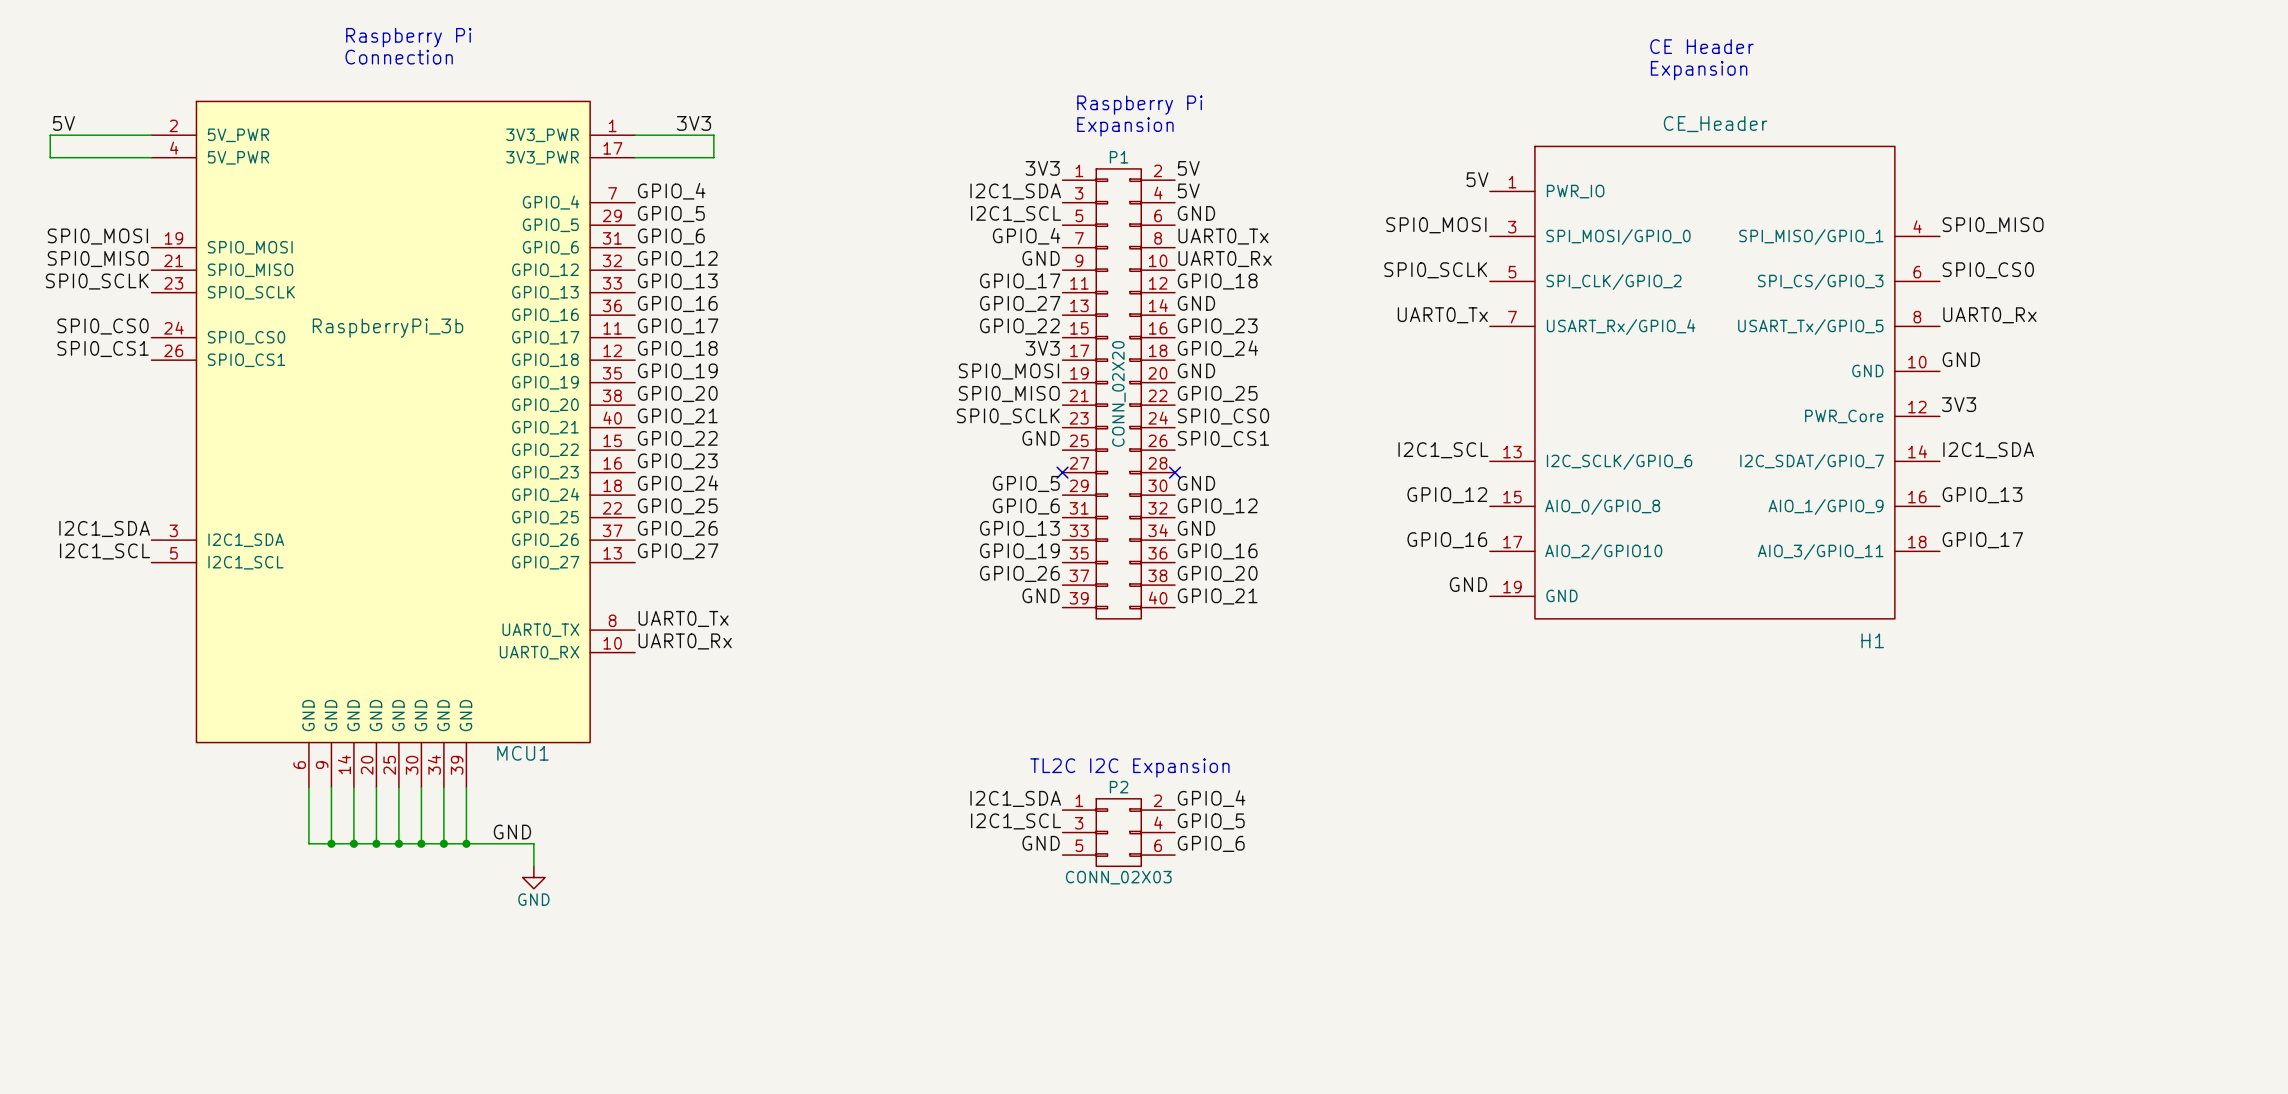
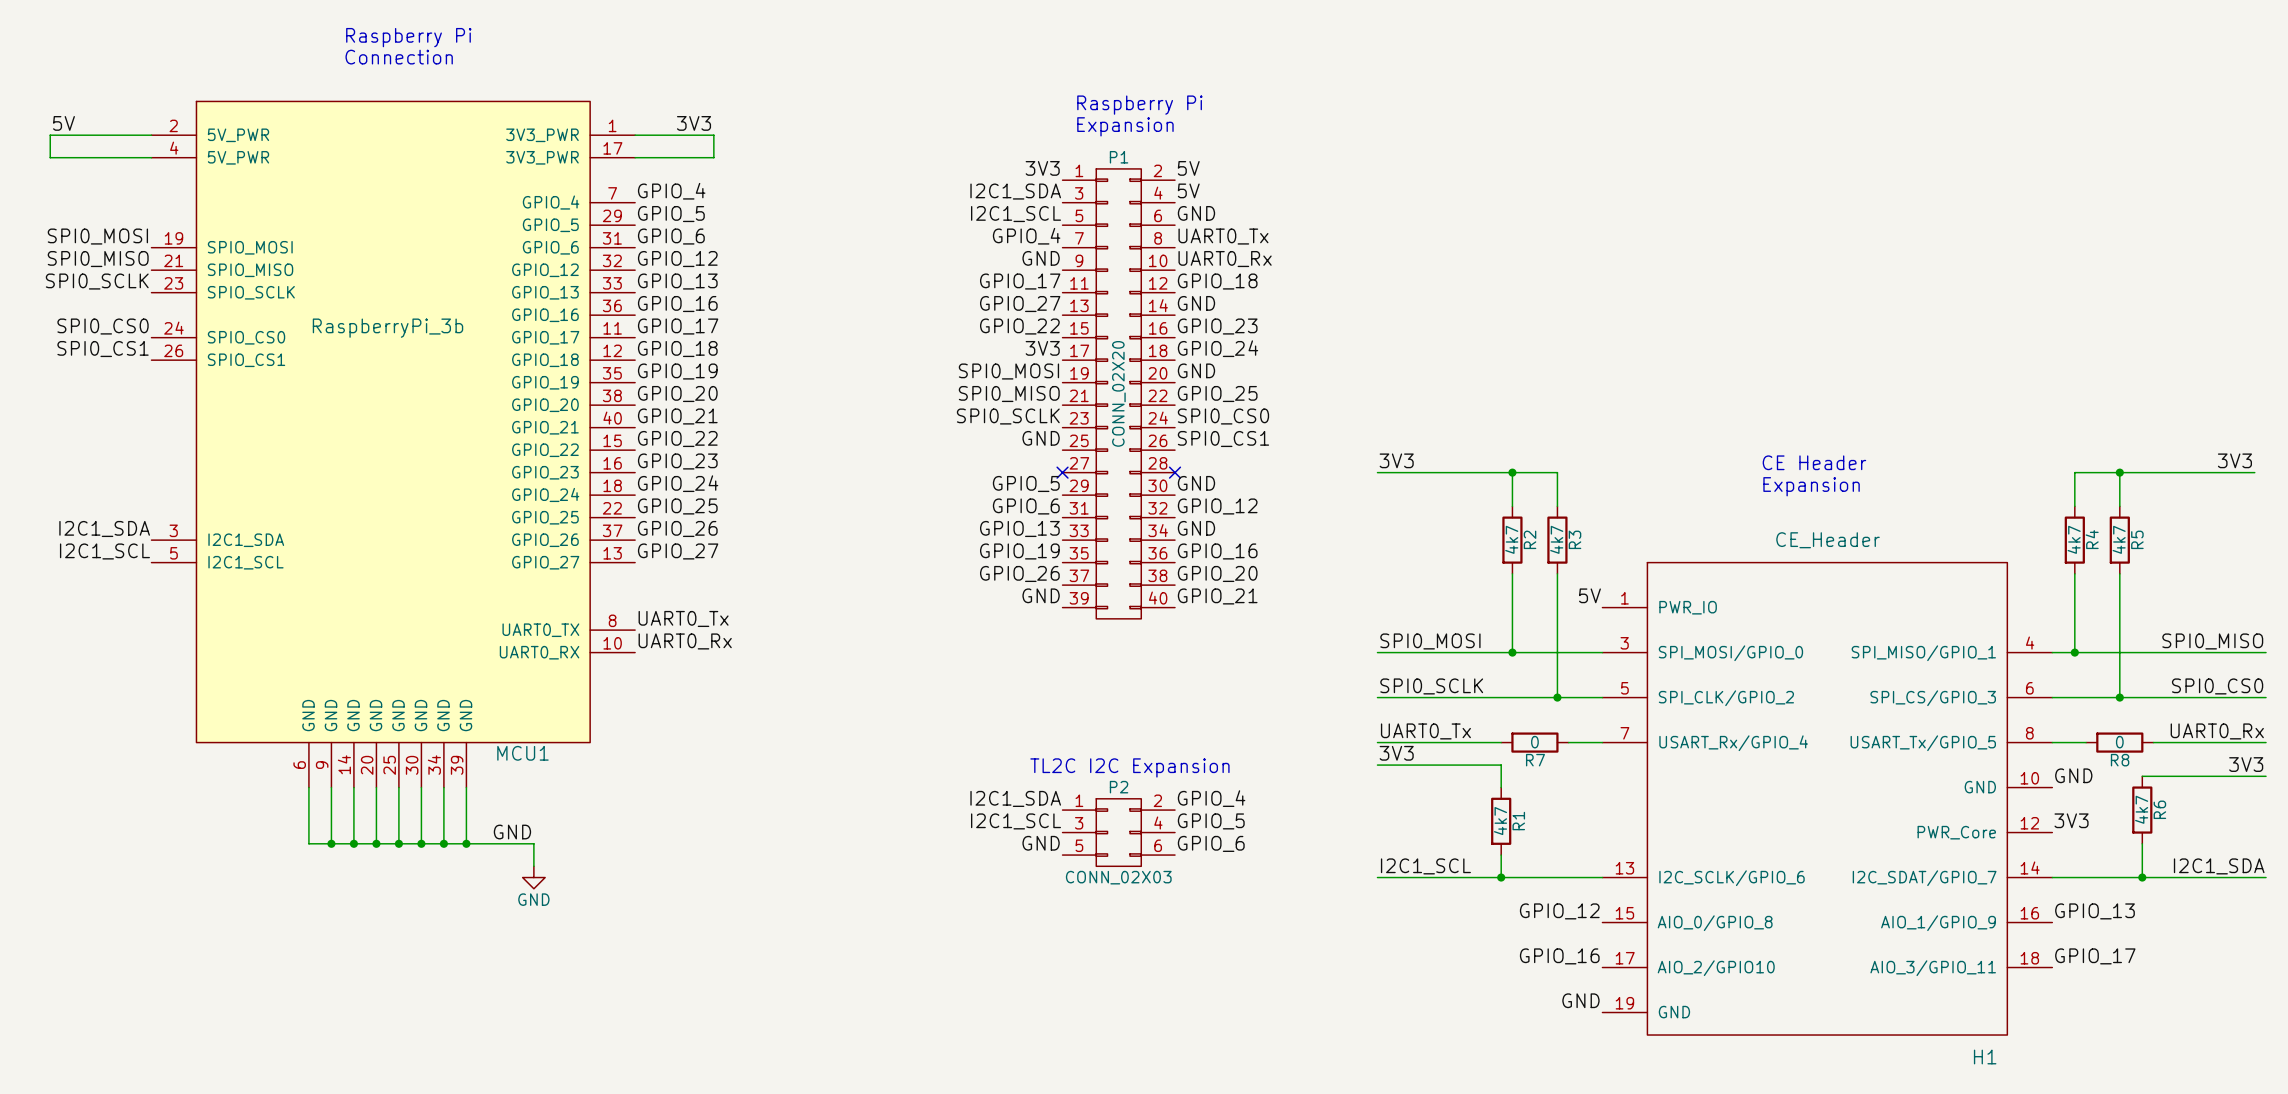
text: CE Header (1701, 46) -> none
text: Expansion (1699, 70) -> none
label: 5V (1477, 179) -> none
label: SPI0_MOSI (1436, 225) -> none
label: SPI0_MISO (1993, 225) -> none
label: SPI0_SCLK (1435, 270) -> none
label: SPI0_CS0 (1988, 270) -> none
label: UART0_Tx (1442, 315) -> none
label: UART0_Rx (1989, 315) -> none
label: GND (1961, 359) -> none
H1 position: (1714, 382) -> (1827, 798)
label: 3V3 (1959, 404) -> none
label: I2C1_SCL (1443, 450) -> none
label: I2C1_SDA (1988, 450) -> none
label: none -> 3V3 (1396, 460)
label: none -> 3V3 (2234, 460)
text: none -> CE Header (1814, 462)
wire: none -> (1377, 472) (1557, 472) (1557, 506)
wire: none -> (1512, 472) (1512, 506)
junction: none -> (1512, 472)
wire: none -> (2119, 472) (2119, 506)
junction: none -> (2119, 472)
wire: none -> (2254, 472) (2074, 472) (2074, 506)
text: none -> Expansion (1811, 486)
label: GPIO_12 (1447, 495) -> none
label: GPIO_13 (1982, 495) -> none
label: GPIO_16 (1447, 540) -> none
R2: none -> 4k7 (1512, 540)
R3: none -> 4k7 (1557, 540)
label: GPIO_17 (1982, 540) -> none
R4: none -> 4k7 (2074, 540)
R5: none -> 4k7 (2119, 540)
wire: none -> (1512, 573) (1512, 652)
wire: none -> (1557, 573) (1557, 697)
wire: none -> (2074, 573) (2074, 652)
wire: none -> (2119, 573) (2119, 697)
label: GND (1468, 584) -> none
label: none -> 5V (1589, 595)
label: none -> SPI0_MOSI (1430, 641)
label: none -> SPI0_MISO (2212, 641)
wire: none -> (1377, 652) (1602, 652)
junction: none -> (1512, 652)
wire: none -> (2052, 652) (2266, 652)
junction: none -> (2074, 652)
label: none -> SPI0_SCLK (1431, 686)
label: none -> SPI0_CS0 (2217, 686)
wire: none -> (1377, 697) (1602, 697)
junction: none -> (1557, 697)
wire: none -> (2052, 697) (2266, 697)
junction: none -> (2119, 697)
label: none -> UART0_Tx (1425, 731)
label: none -> UART0_Rx (2217, 731)
wire: none -> (1377, 742) (1501, 742)
R7: none -> 0 (1534, 742)
wire: none -> (1568, 742) (1602, 742)
wire: none -> (2052, 742) (2086, 742)
R8: none -> 0 (2119, 742)
wire: none -> (2153, 742) (2266, 742)
label: none -> 3V3 (1396, 753)
label: none -> 3V3 (2246, 764)
wire: none -> (1377, 765) (1501, 765) (1501, 787)
label: none -> GND (2073, 775)
wire: none -> (2142, 776) (2266, 776)
R6: none -> 4k7 (2142, 810)
label: none -> 3V3 (2071, 820)
R1: none -> 4k7 (1501, 821)
wire: none -> (2142, 843) (2142, 877)
wire: none -> (1501, 855) (1501, 877)
label: none -> I2C1_SCL (1425, 866)
label: none -> I2C1_SDA (2219, 866)
wire: none -> (1377, 877) (1602, 877)
junction: none -> (1501, 877)
wire: none -> (2052, 877) (2266, 877)
junction: none -> (2142, 877)
label: none -> GPIO_12 (1559, 911)
label: none -> GPIO_13 (2094, 911)
label: none -> GPIO_16 (1559, 956)
label: none -> GPIO_17 (2095, 956)
label: none -> GND (1580, 1000)

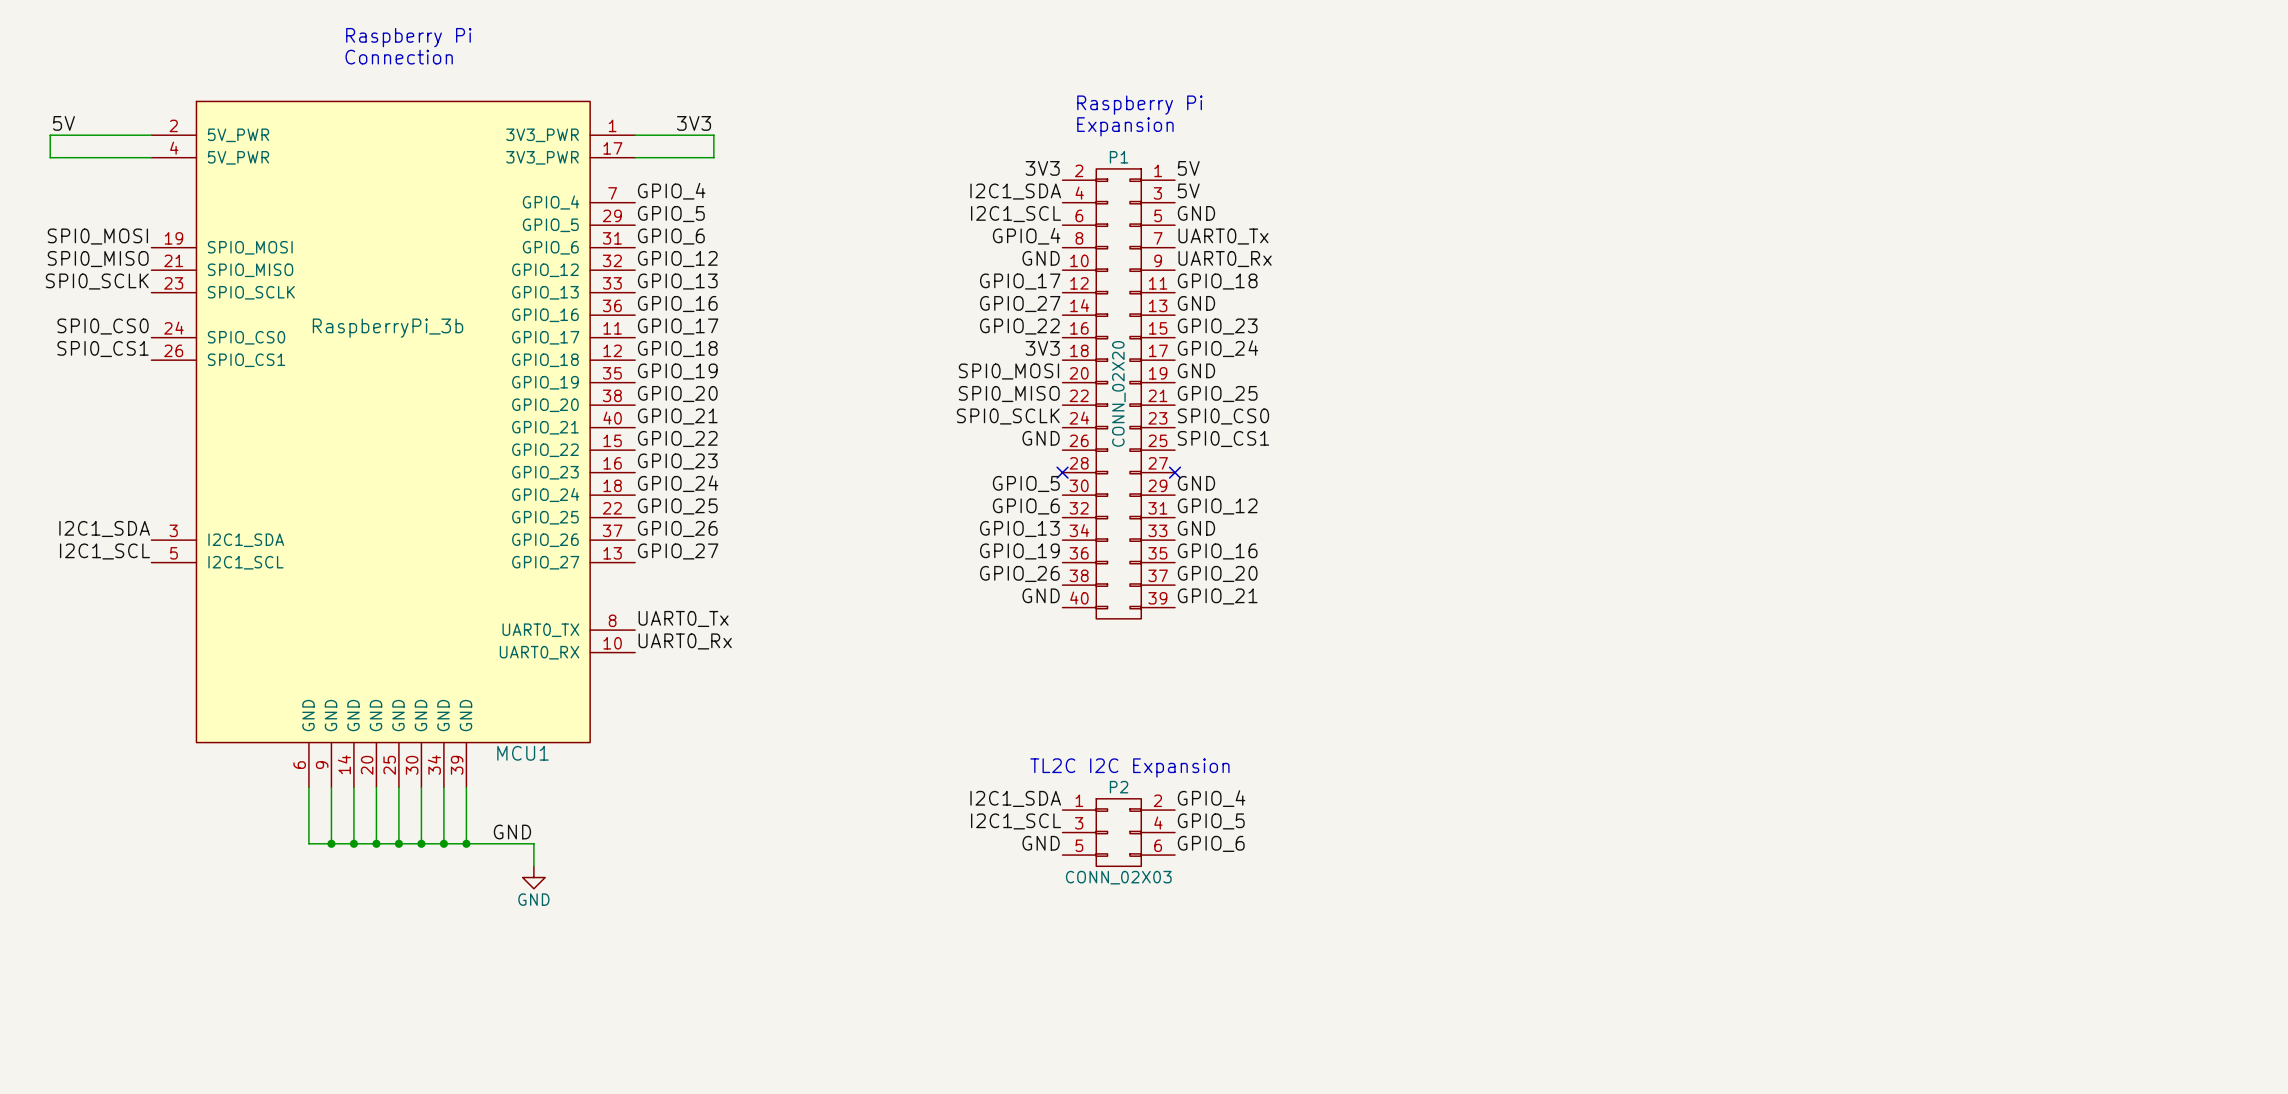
P1 flip: as is (1118, 393) -> left-right (1118, 393)
label: 3V3 (1396, 460) -> none
label: 3V3 (2234, 460) -> none
text: CE Header (1814, 462) -> none
wire: (1377, 472) (1557, 472) (1557, 506) -> none
wire: (1512, 472) (1512, 506) -> none
junction: (1512, 472) -> none
wire: (2119, 472) (2119, 506) -> none
junction: (2119, 472) -> none
wire: (2254, 472) (2074, 472) (2074, 506) -> none
text: Expansion (1811, 486) -> none
R2: 4k7 (1512, 540) -> none
R3: 4k7 (1557, 540) -> none
R4: 4k7 (2074, 540) -> none
R5: 4k7 (2119, 540) -> none
wire: (1512, 573) (1512, 652) -> none
wire: (1557, 573) (1557, 697) -> none
wire: (2074, 573) (2074, 652) -> none
wire: (2119, 573) (2119, 697) -> none
label: 5V (1589, 595) -> none
label: SPI0_MOSI (1430, 641) -> none
label: SPI0_MISO (2212, 641) -> none
wire: (1377, 652) (1602, 652) -> none
junction: (1512, 652) -> none
wire: (2052, 652) (2266, 652) -> none
junction: (2074, 652) -> none
label: SPI0_SCLK (1431, 686) -> none
label: SPI0_CS0 (2217, 686) -> none
wire: (1377, 697) (1602, 697) -> none
junction: (1557, 697) -> none
wire: (2052, 697) (2266, 697) -> none
junction: (2119, 697) -> none
label: UART0_Tx (1425, 731) -> none
label: UART0_Rx (2217, 731) -> none
wire: (1377, 742) (1501, 742) -> none
R7: 0 (1534, 742) -> none
wire: (1568, 742) (1602, 742) -> none
wire: (2052, 742) (2086, 742) -> none
R8: 0 (2119, 742) -> none
wire: (2153, 742) (2266, 742) -> none
label: 3V3 (1396, 753) -> none
label: 3V3 (2246, 764) -> none
wire: (1377, 765) (1501, 765) (1501, 787) -> none
label: GND (2073, 775) -> none
wire: (2142, 776) (2266, 776) -> none
H1: CE_Header (1827, 798) -> none
R6: 4k7 (2142, 810) -> none
label: 3V3 (2071, 820) -> none
R1: 4k7 (1501, 821) -> none
wire: (2142, 843) (2142, 877) -> none
wire: (1501, 855) (1501, 877) -> none
label: I2C1_SCL (1425, 866) -> none
label: I2C1_SDA (2219, 866) -> none
wire: (1377, 877) (1602, 877) -> none
junction: (1501, 877) -> none
wire: (2052, 877) (2266, 877) -> none
junction: (2142, 877) -> none
label: GPIO_12 (1559, 911) -> none
label: GPIO_13 (2094, 911) -> none
label: GPIO_16 (1559, 956) -> none
label: GPIO_17 (2095, 956) -> none
label: GND (1580, 1000) -> none

